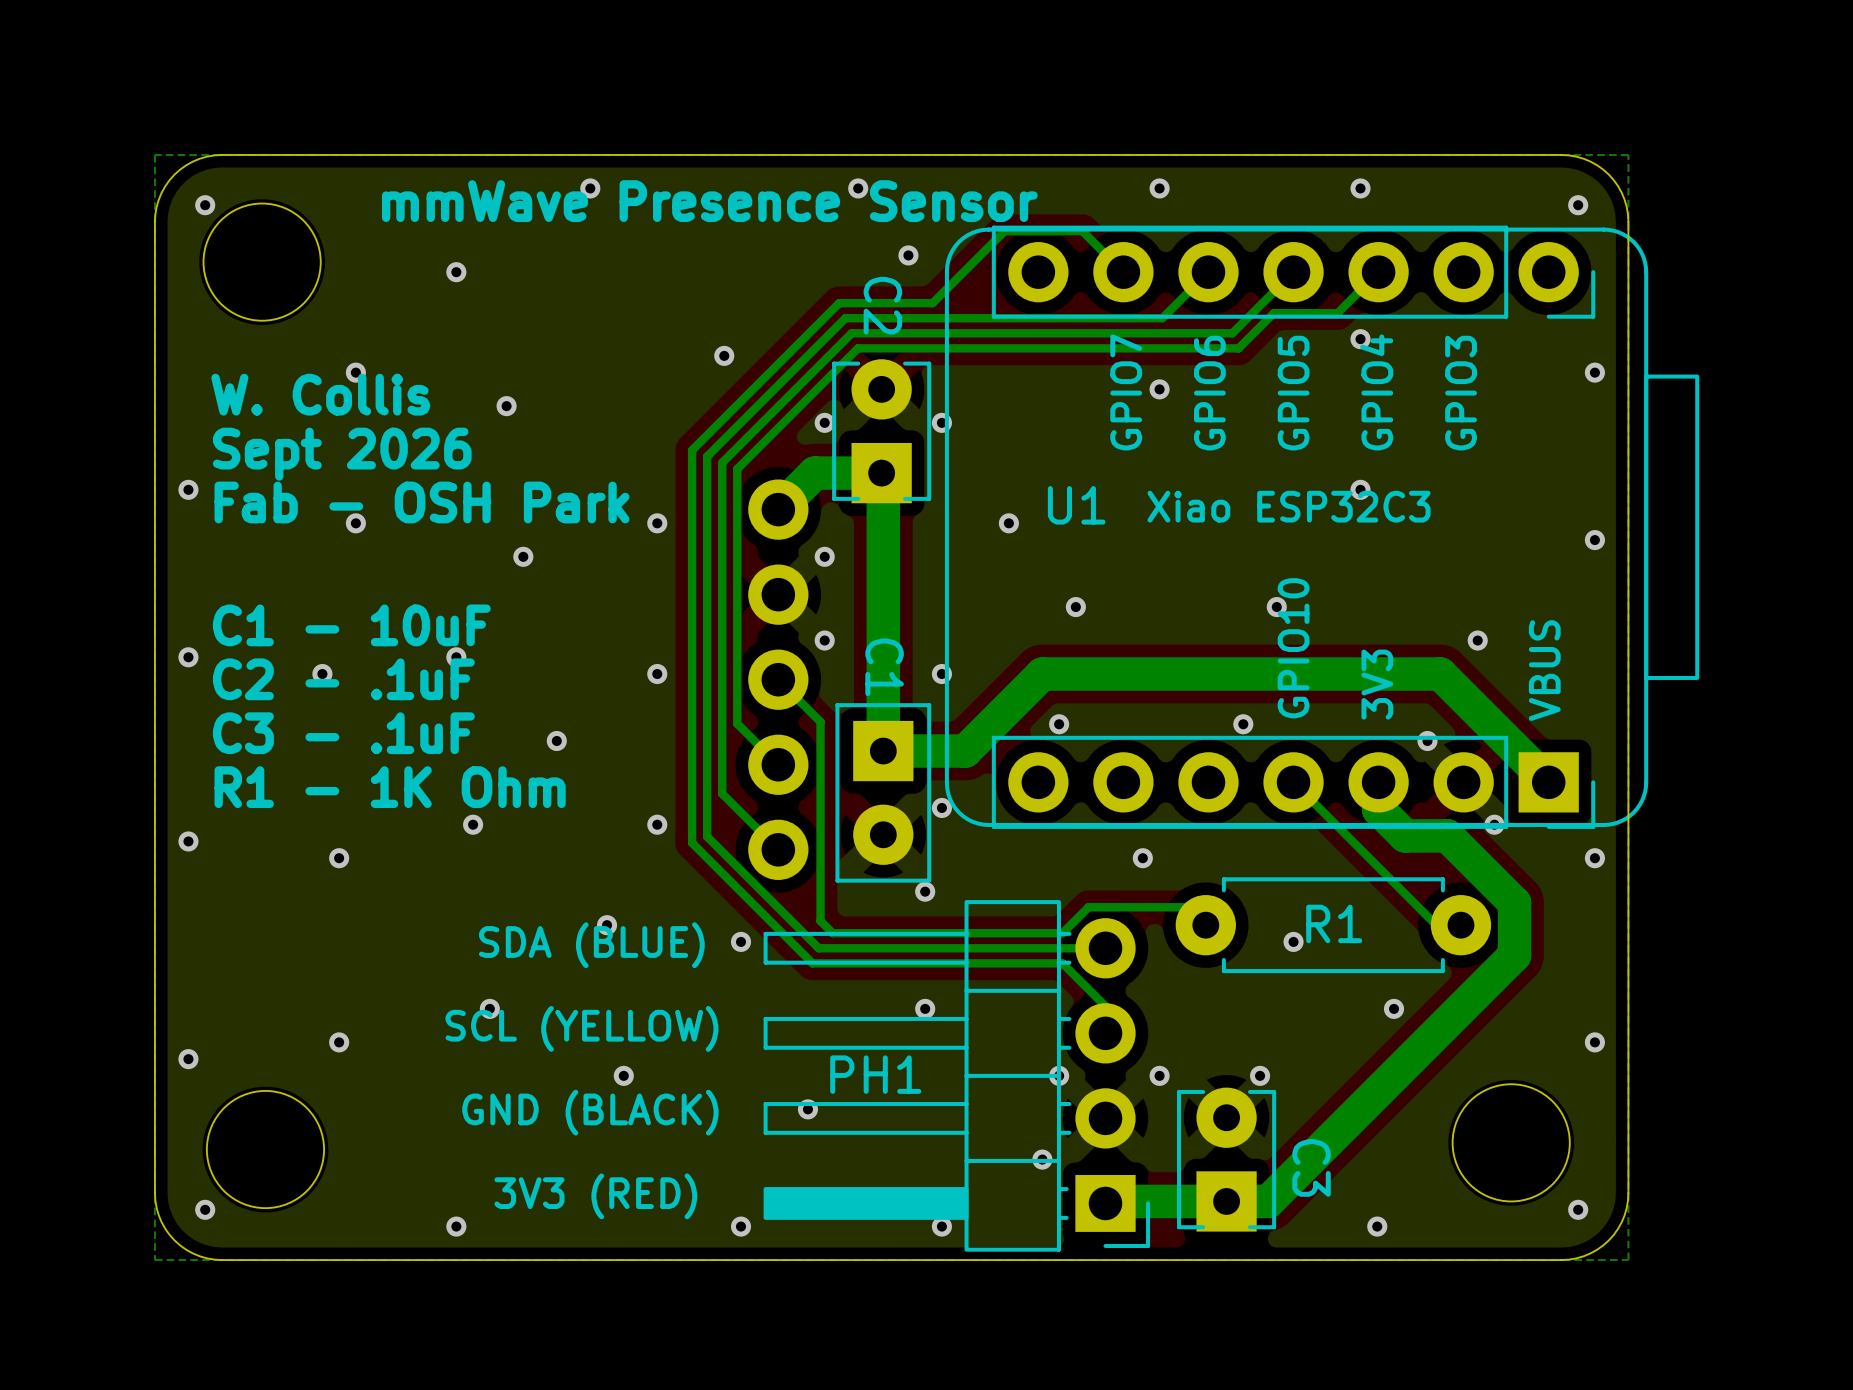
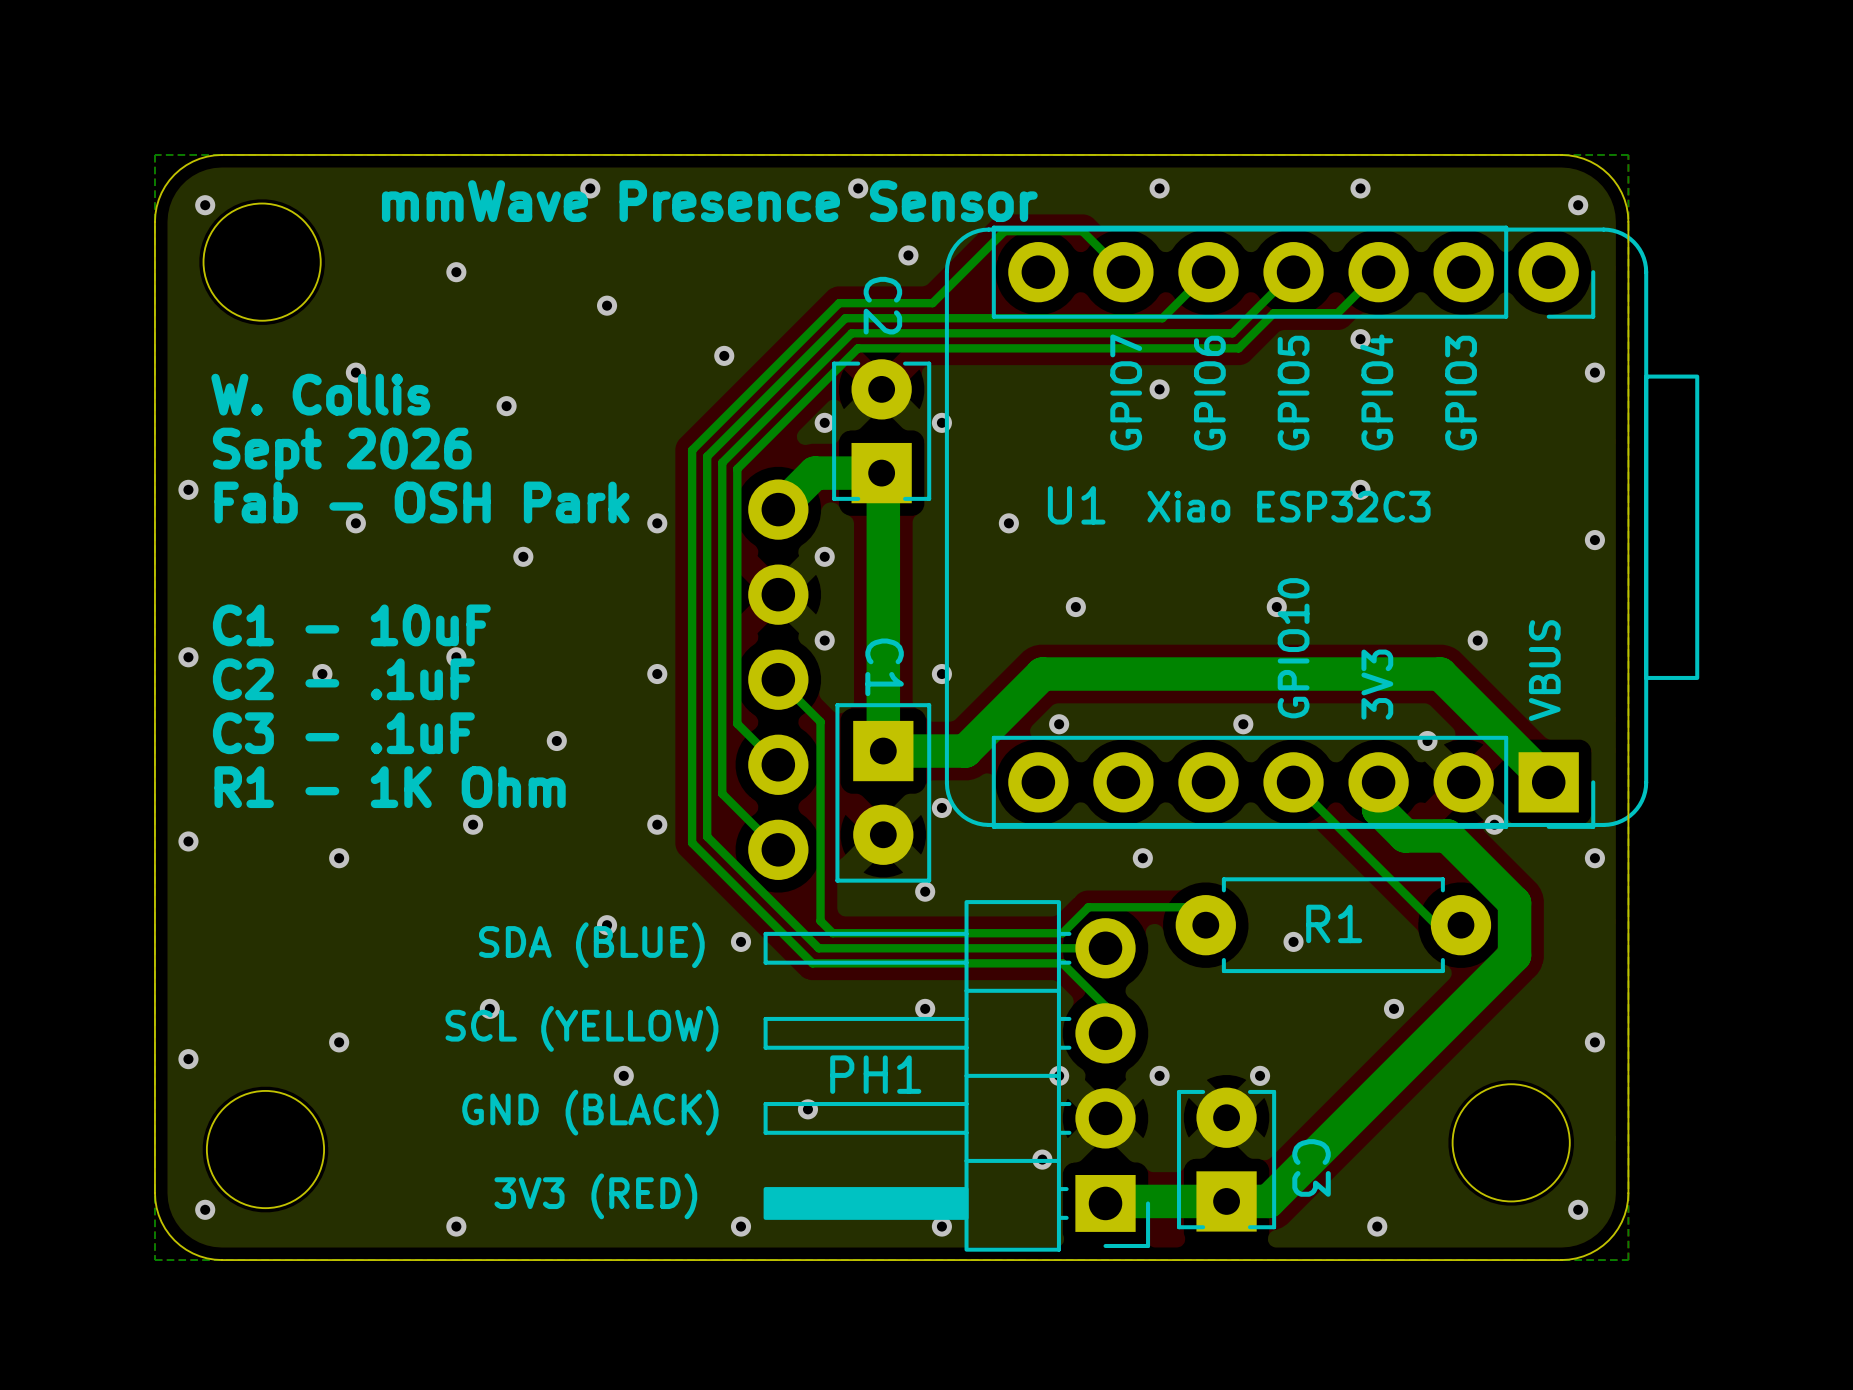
via: none -> (607, 305)

